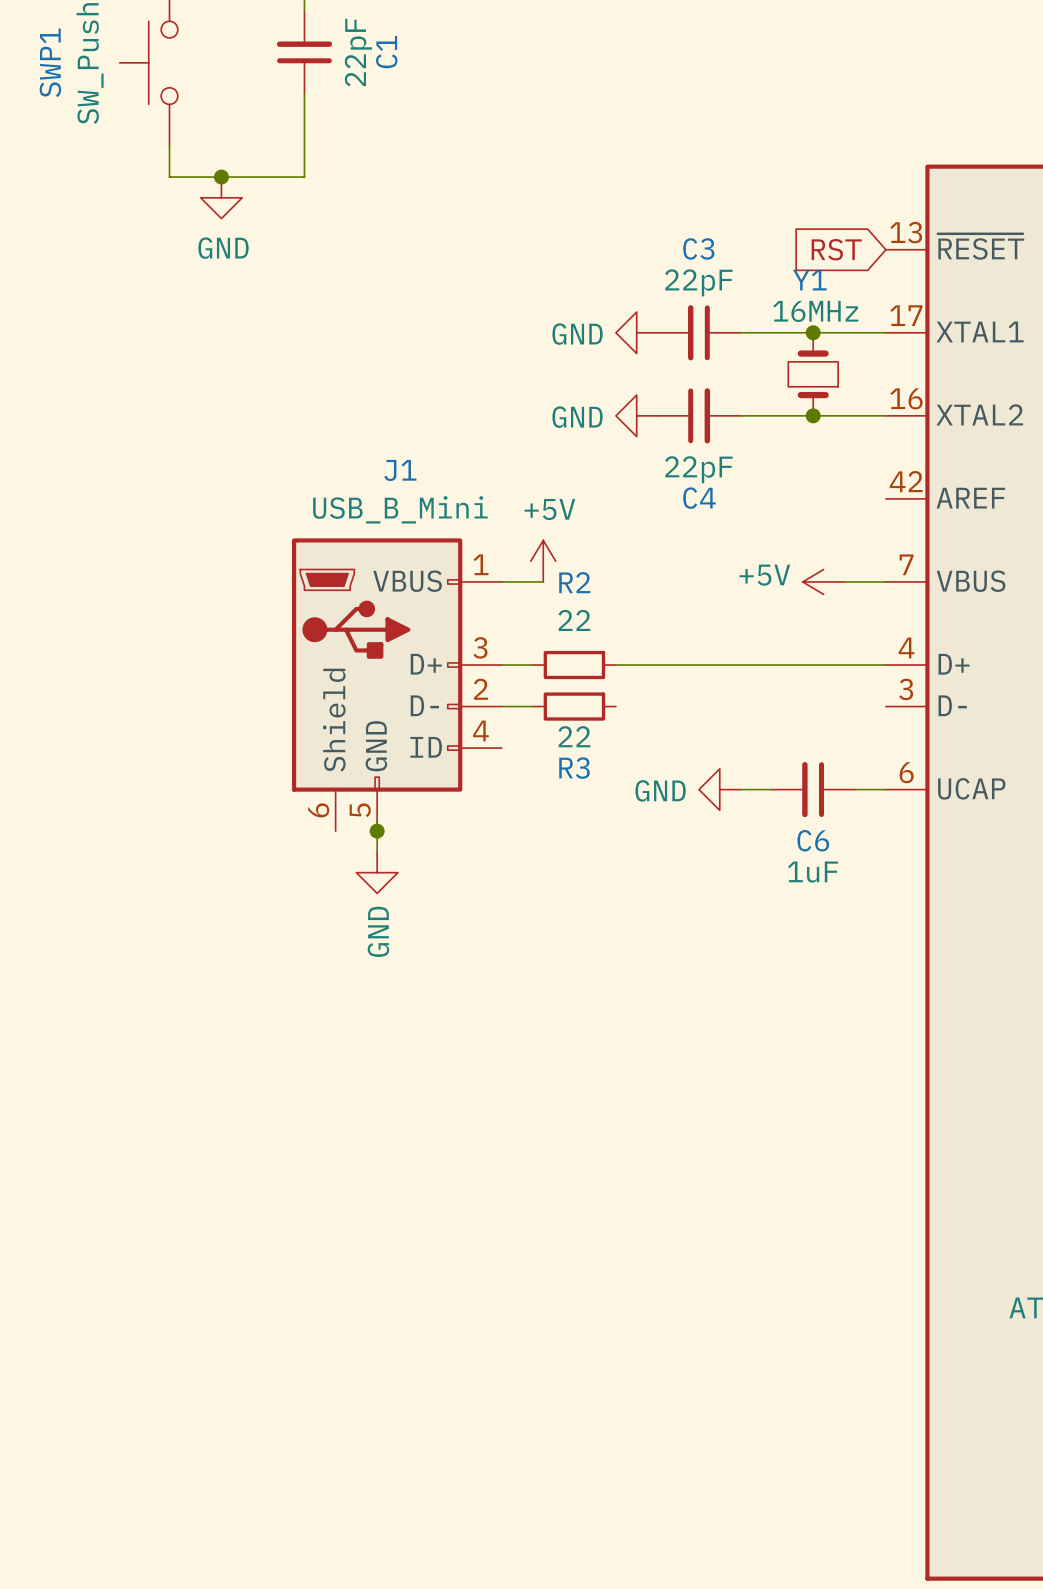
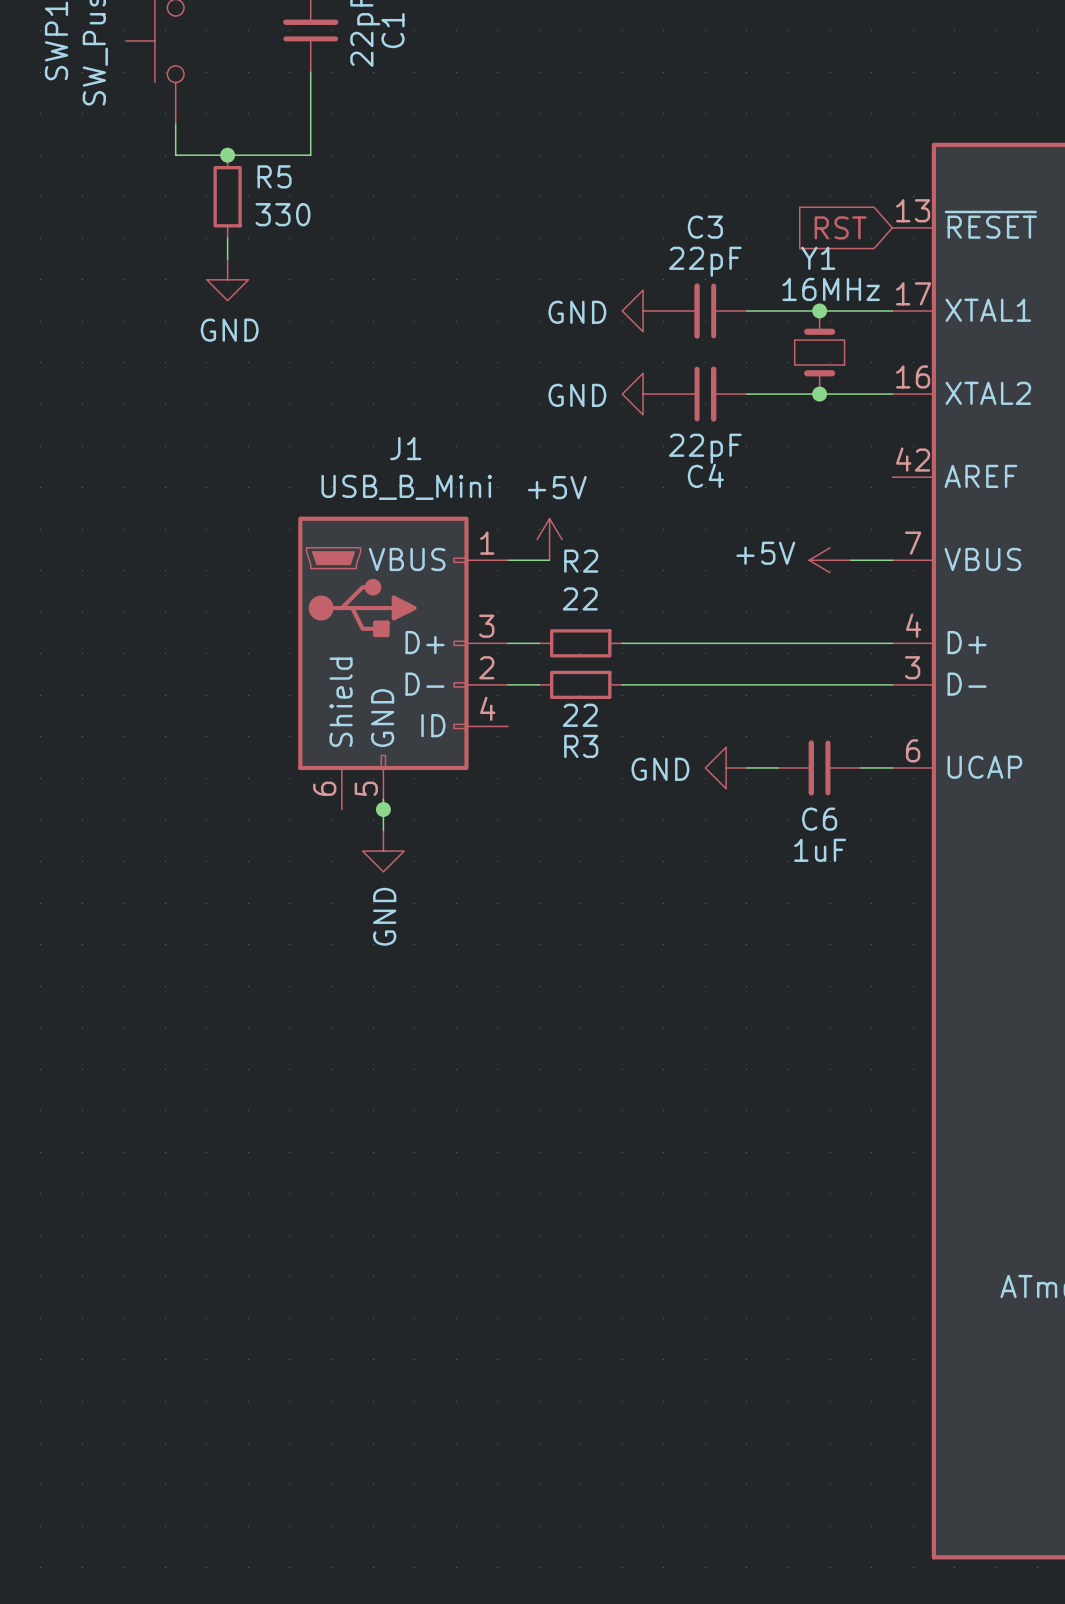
power symbol position: GND (221, 197) -> GND (227, 279)
R5: none -> 330 (227, 196)
wire: none -> (227, 238) (227, 259)
wire: none -> (622, 684) (892, 684)

